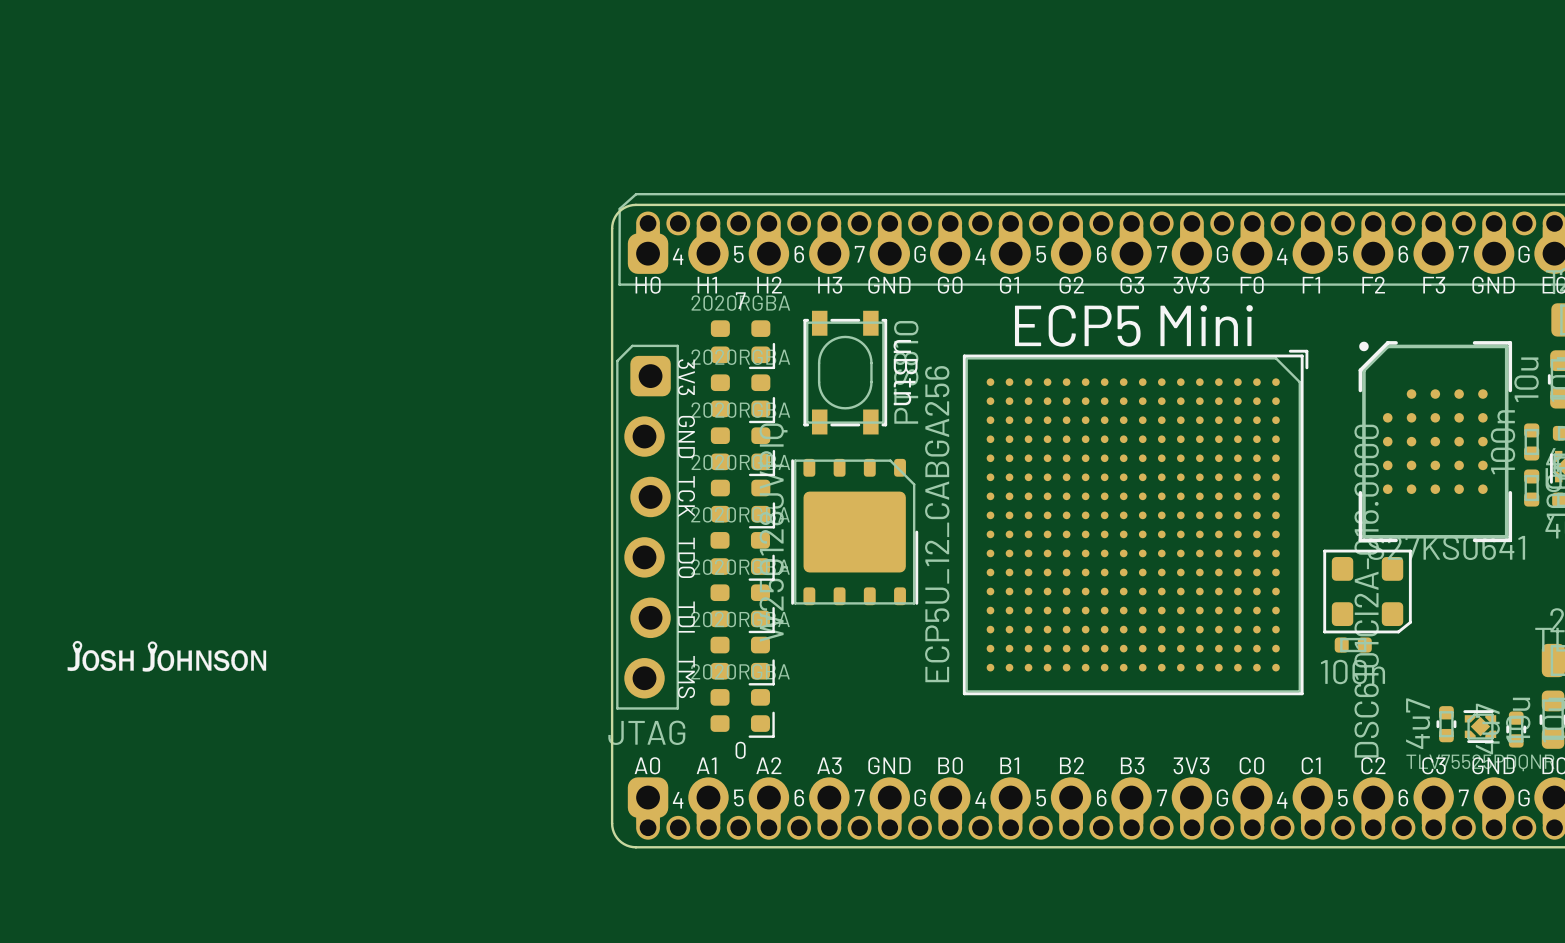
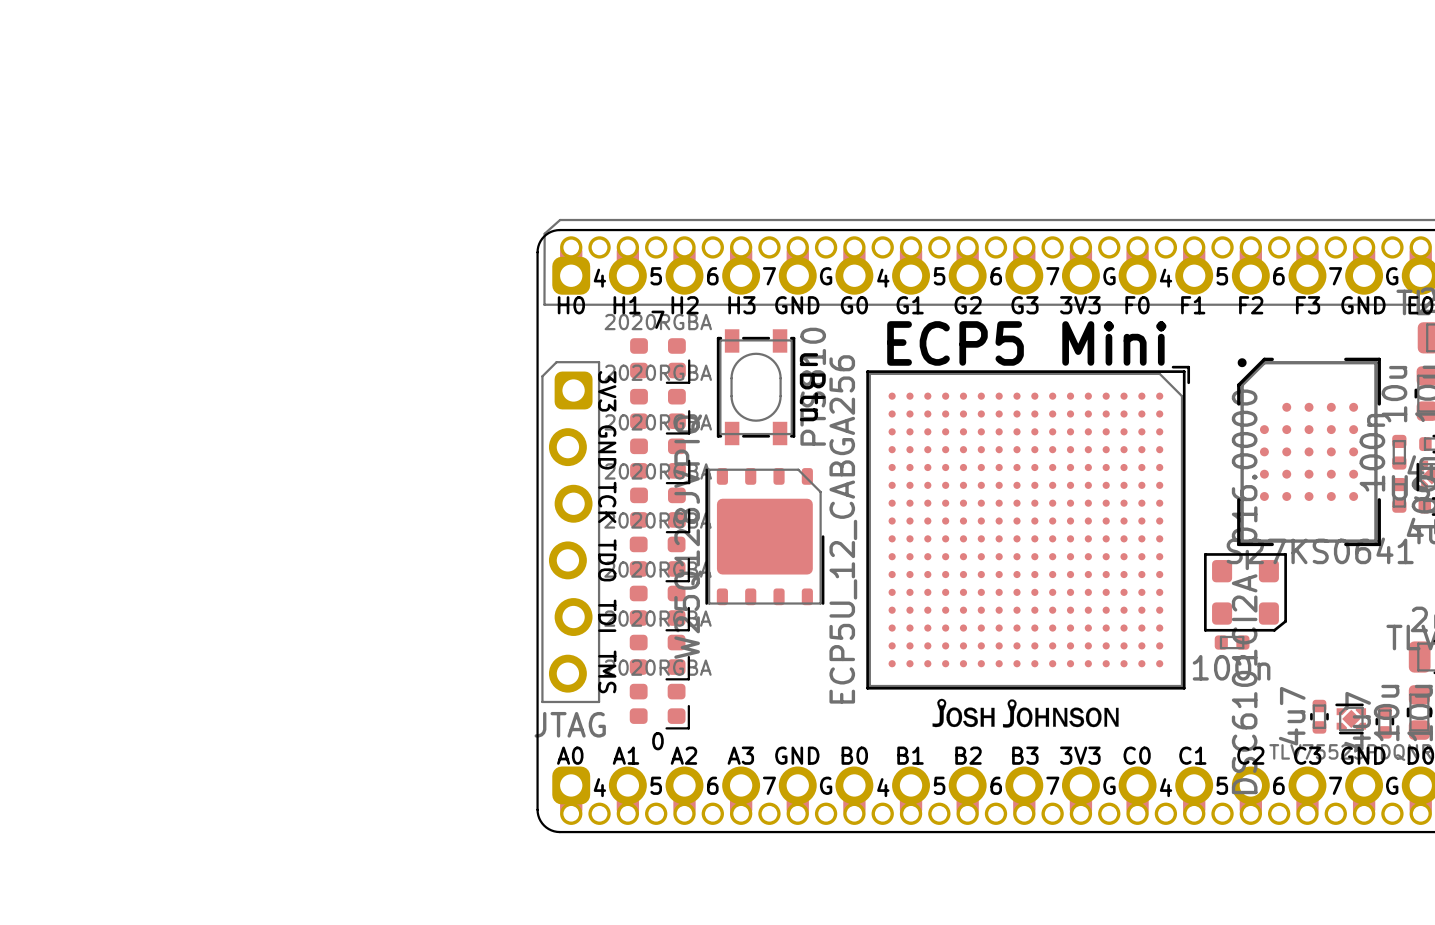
drawing: [67, 640, 267, 672] -> none
drawing: none -> [932, 698, 1119, 728]

